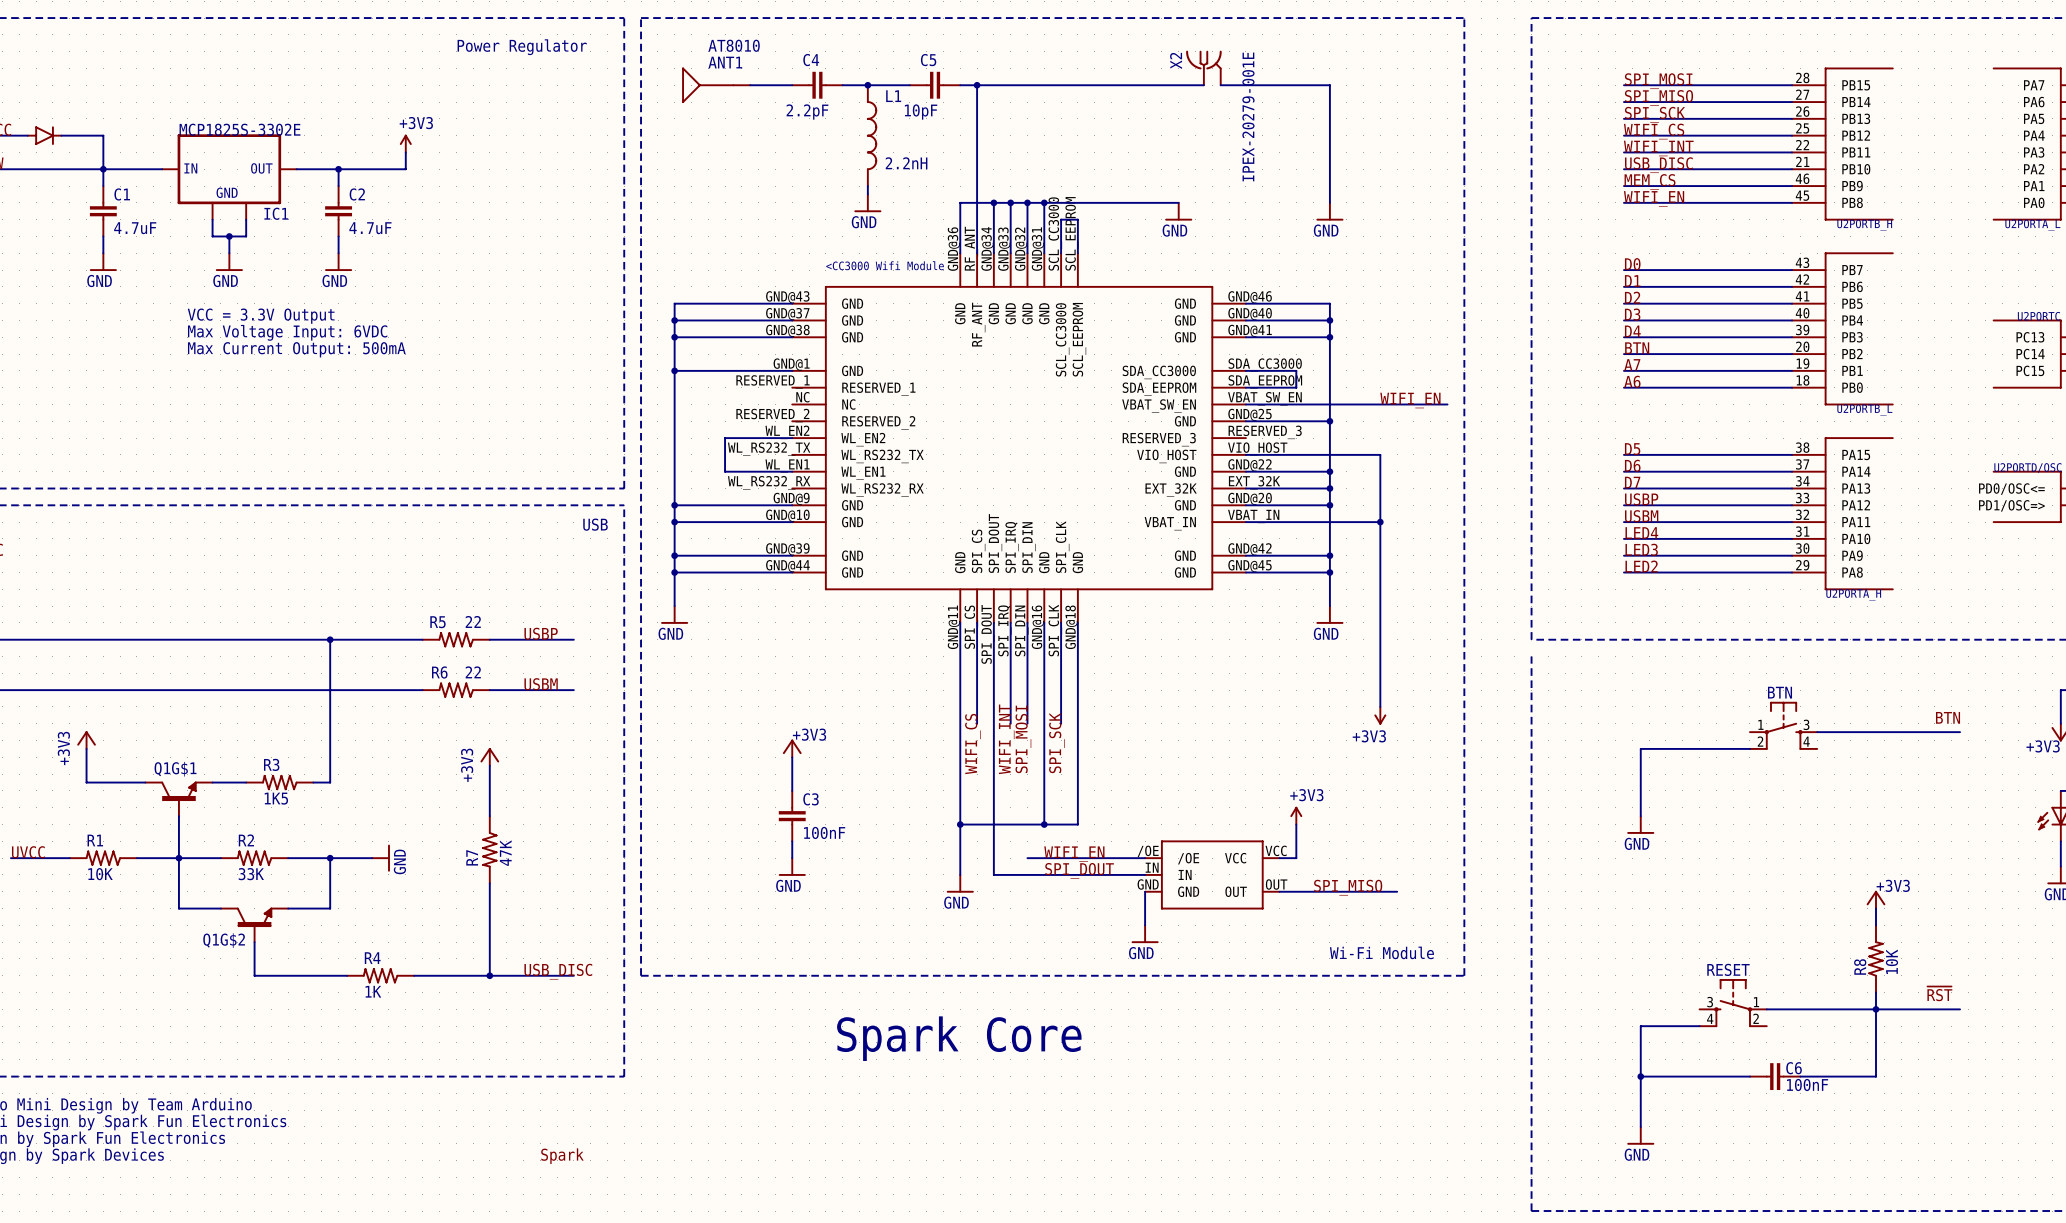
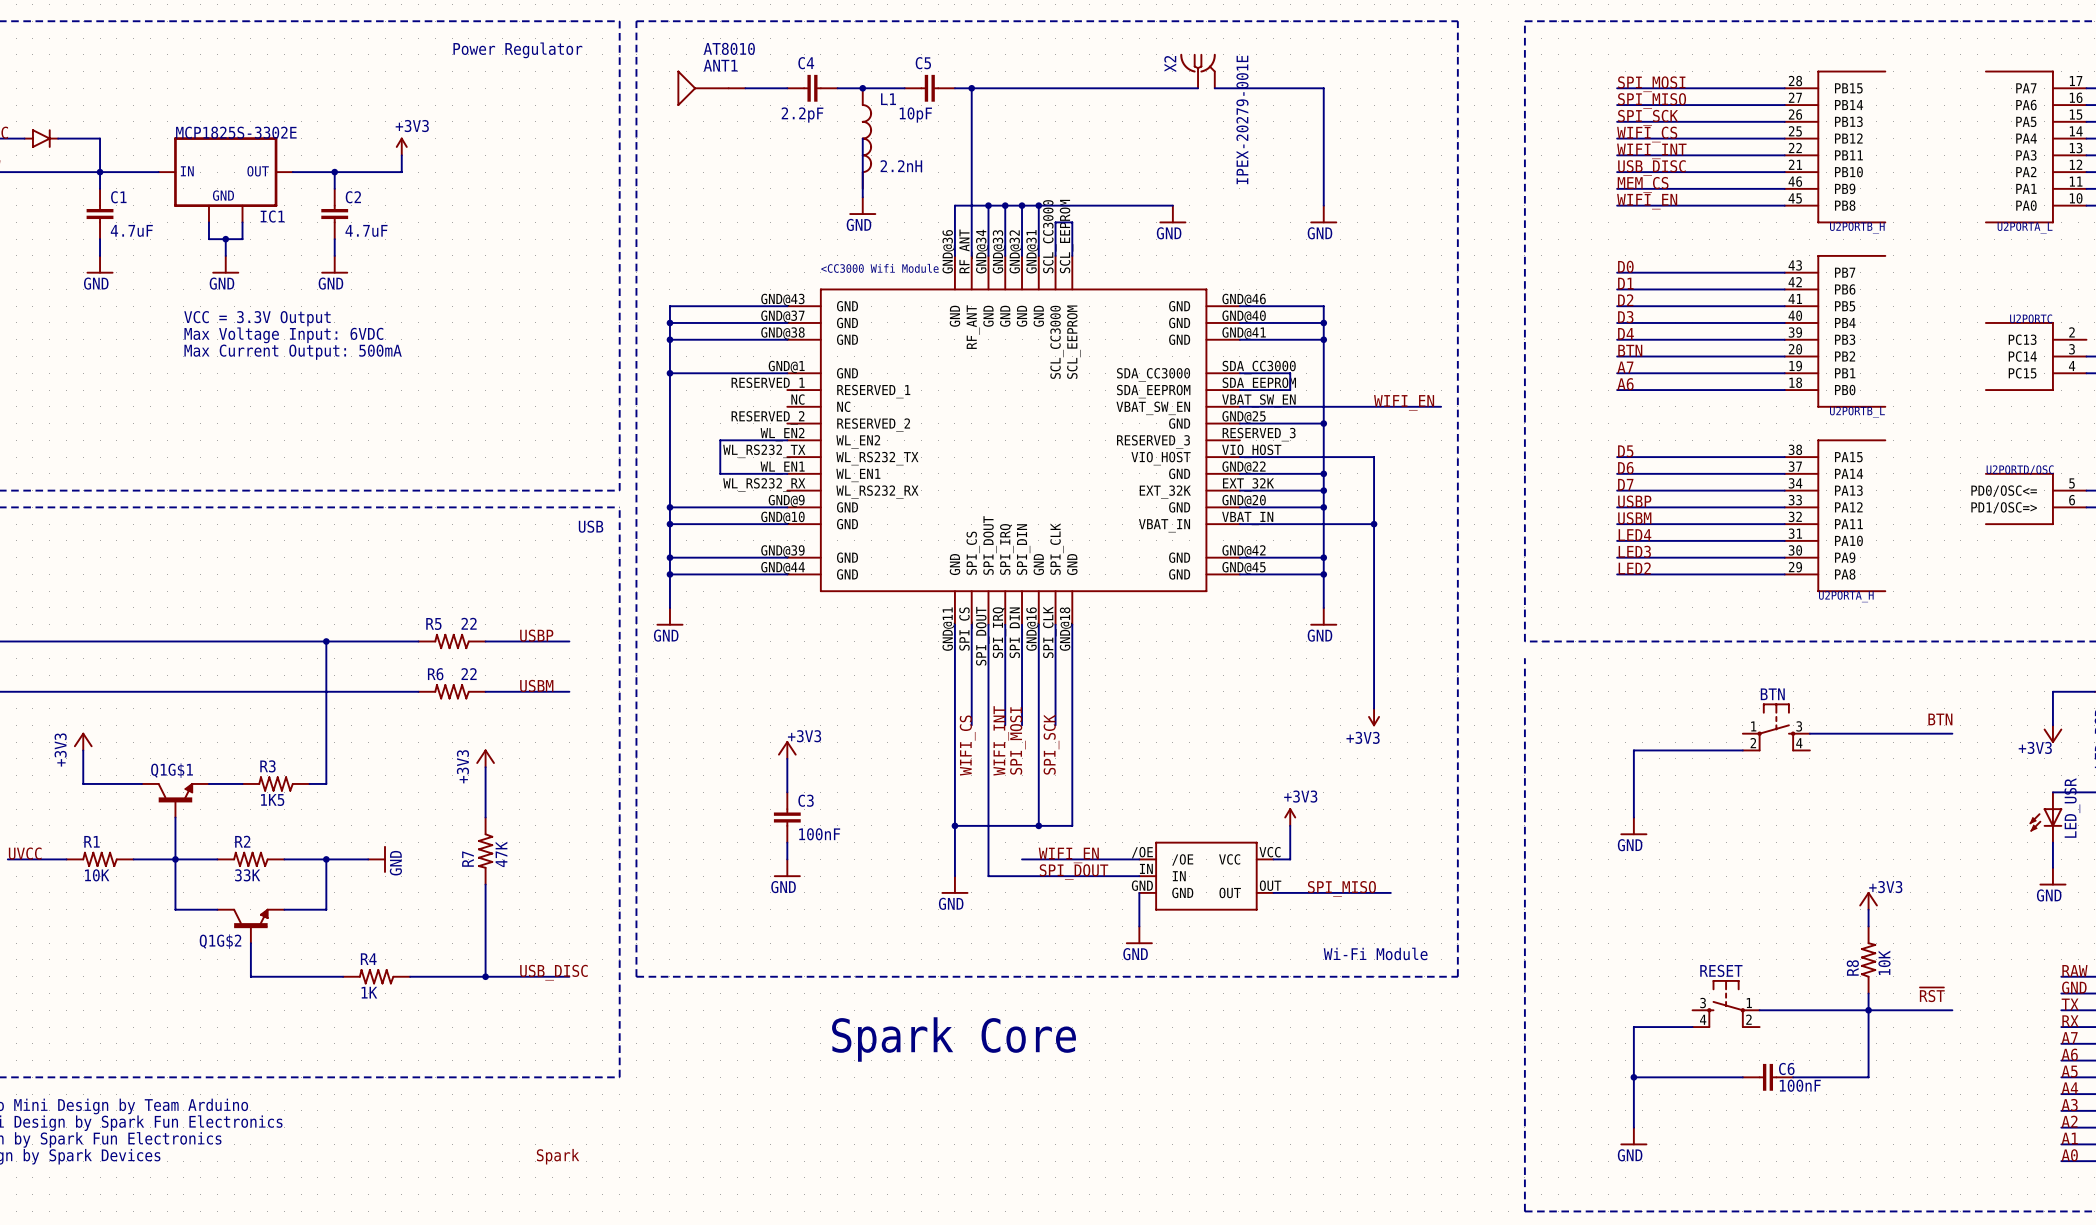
wire: none -> (862, 138) (862, 188)

